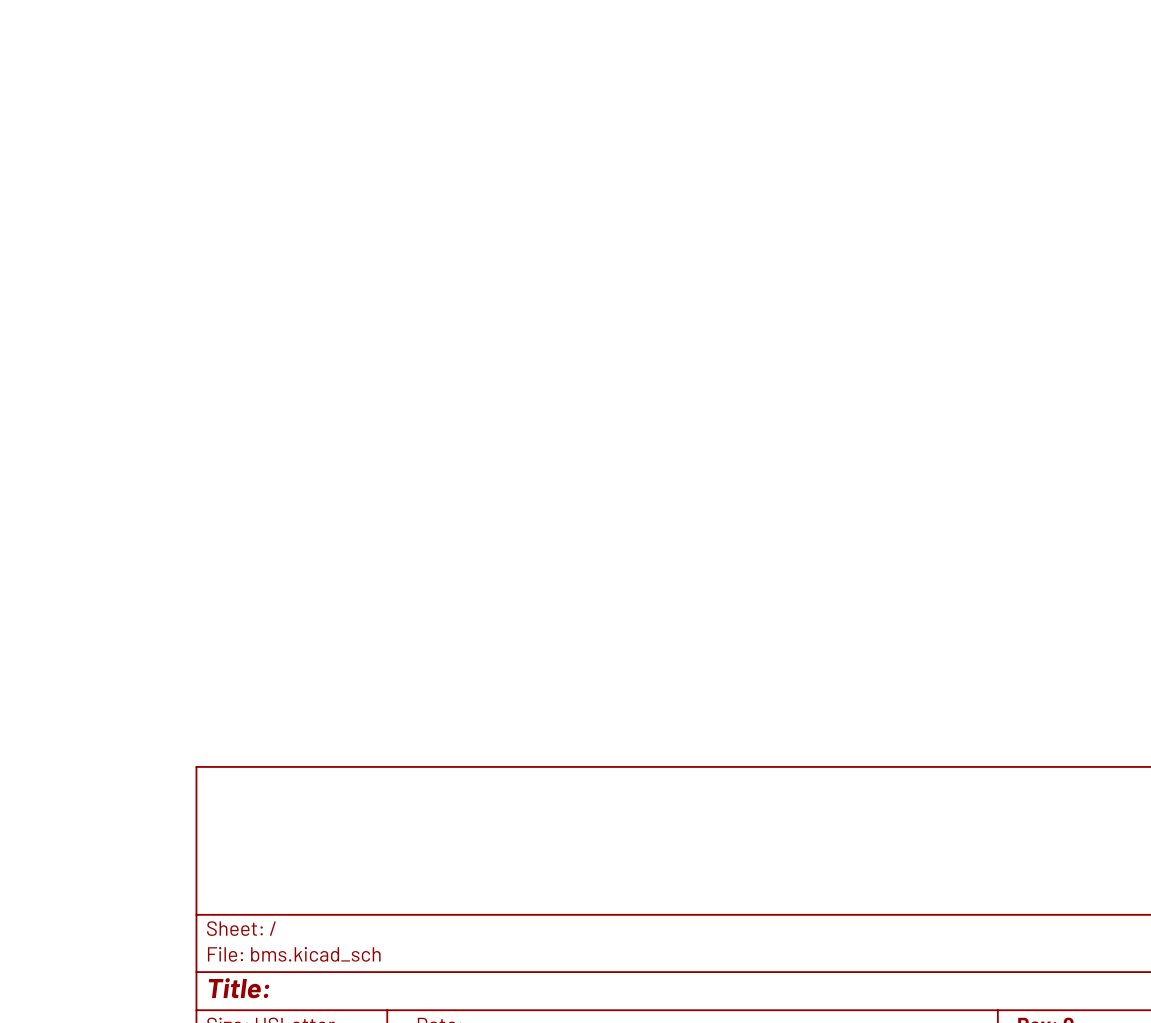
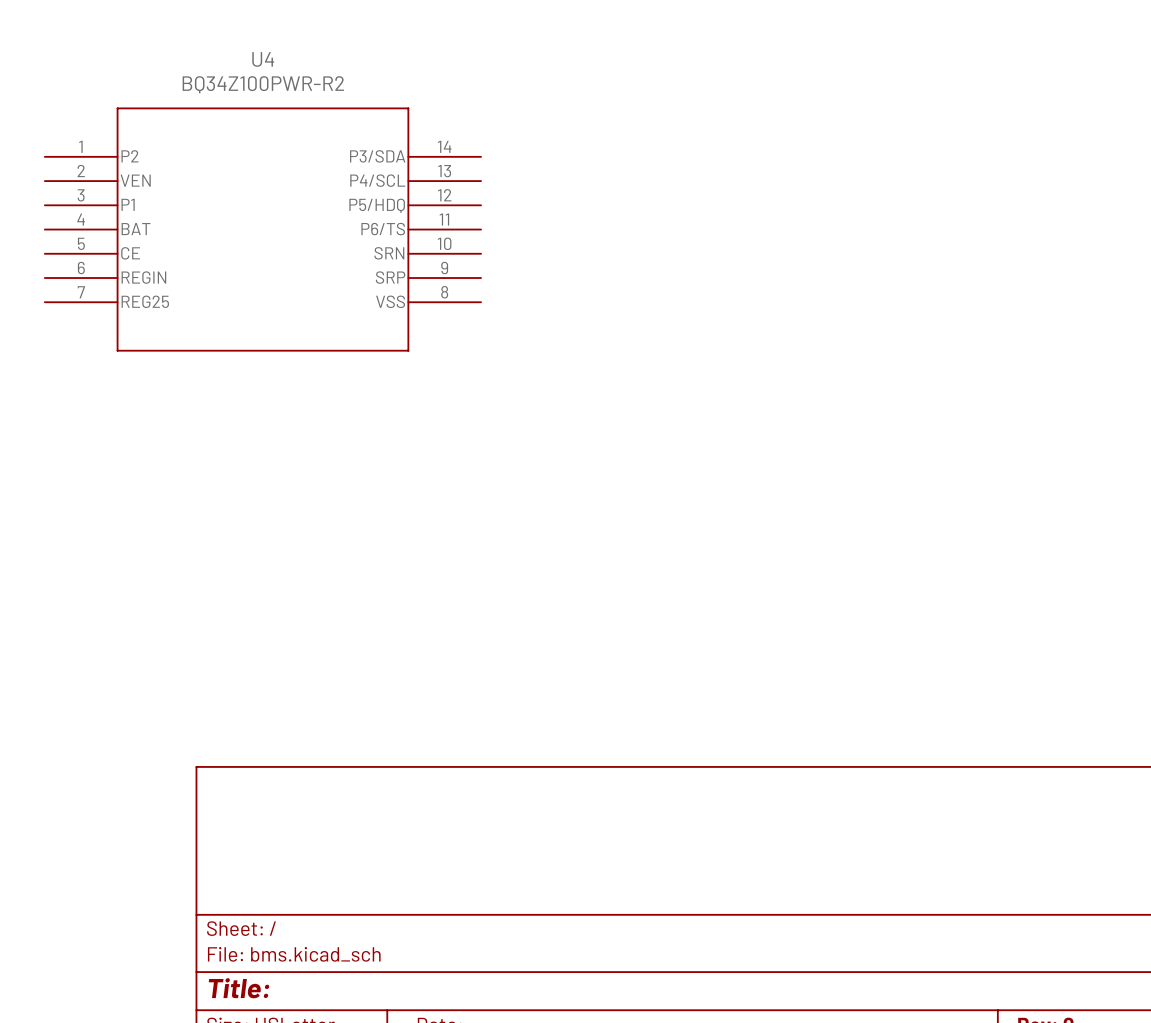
U4: none -> BQ34Z100PWR-R2 (262, 229)

